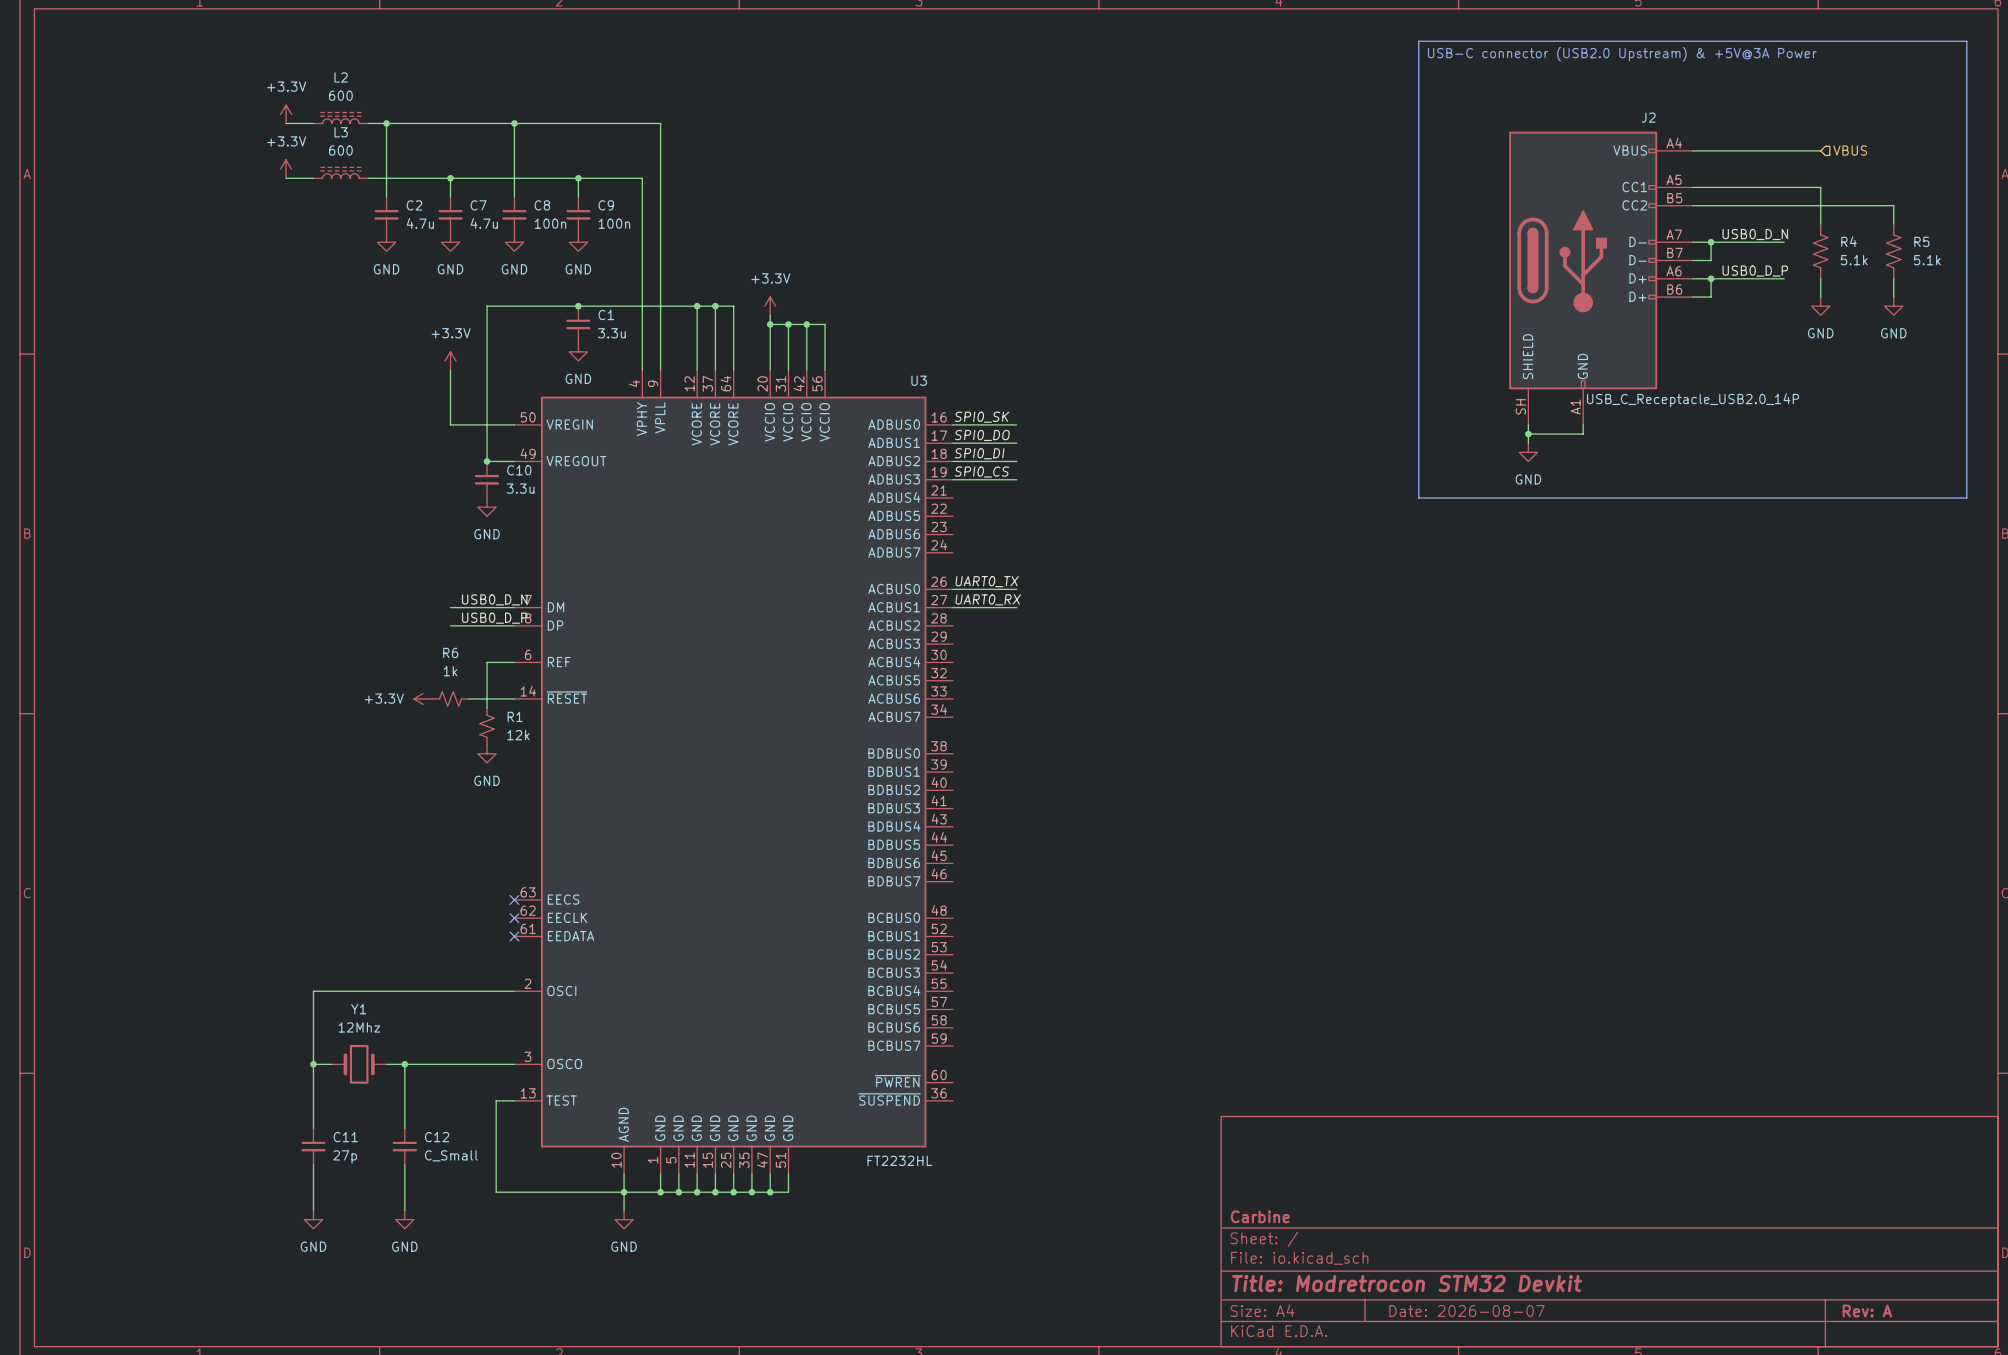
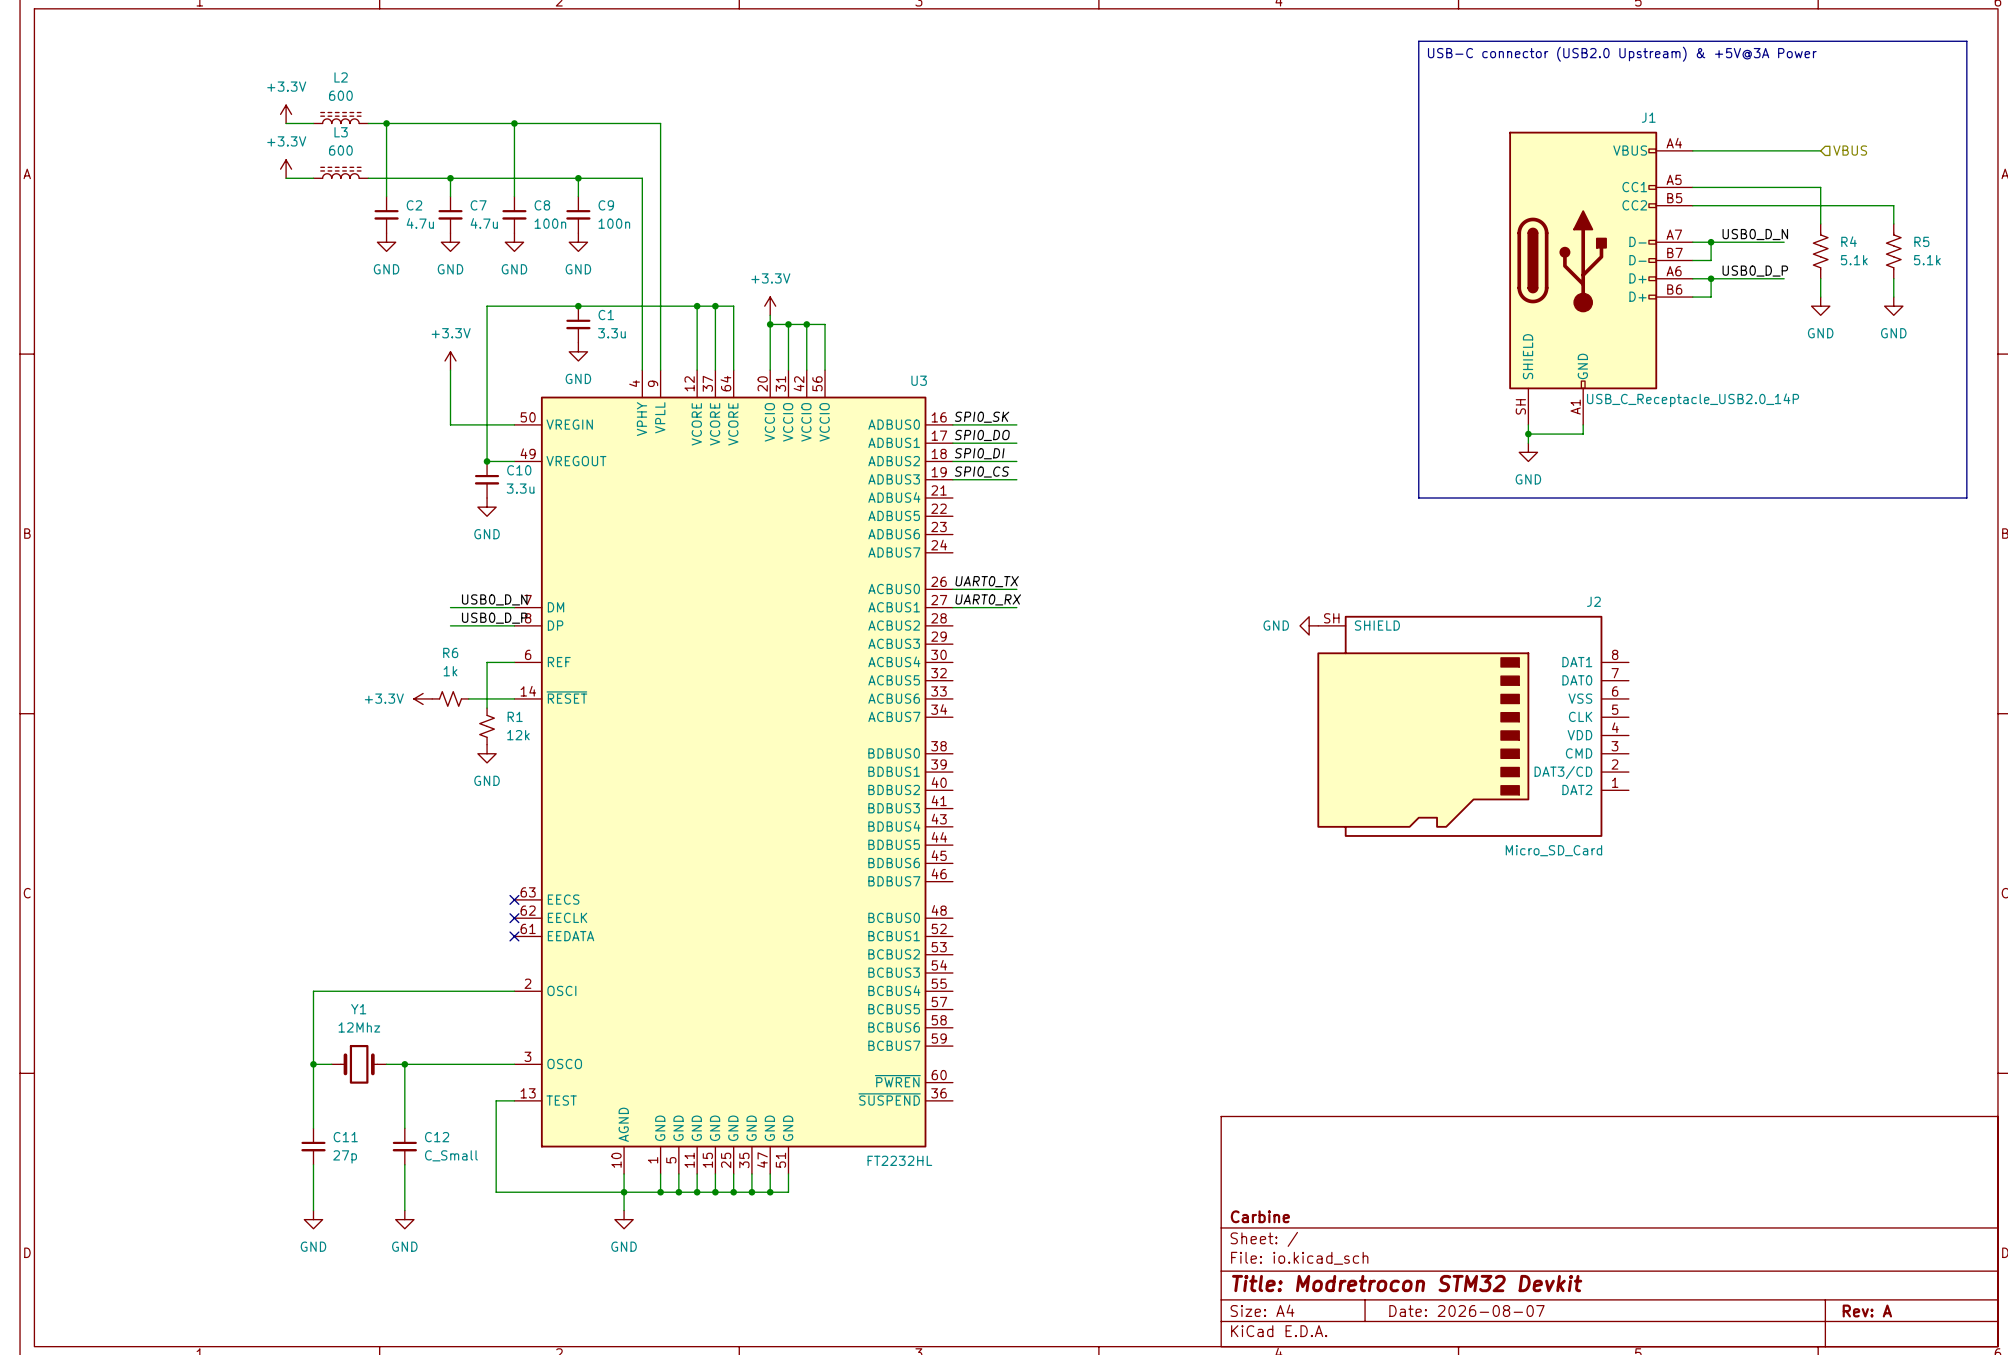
J2 name: J2 (1648, 117) -> J1 (1648, 117)
power symbol: none -> GND (1309, 625)
J2: none -> Micro_SD_Card (1473, 726)

